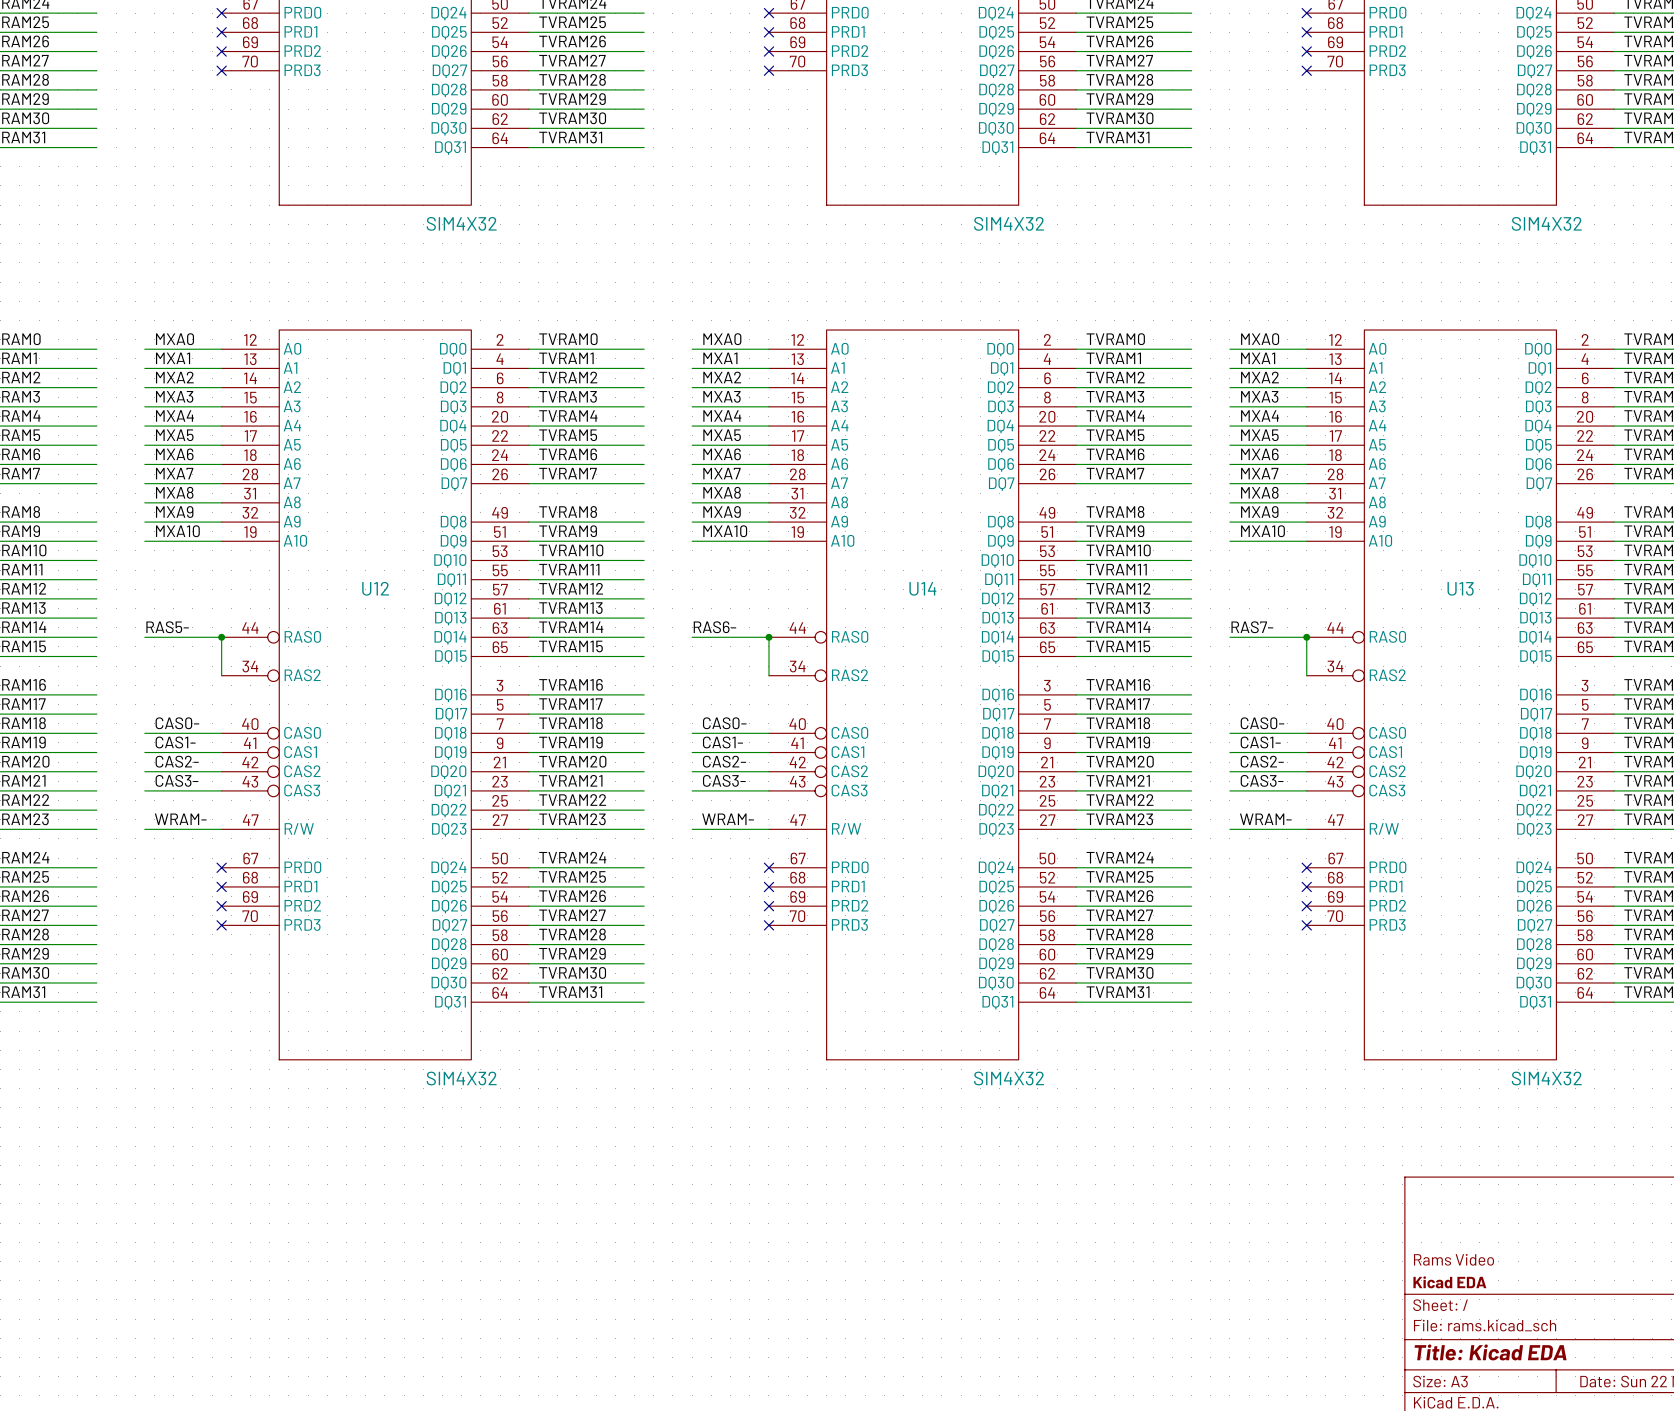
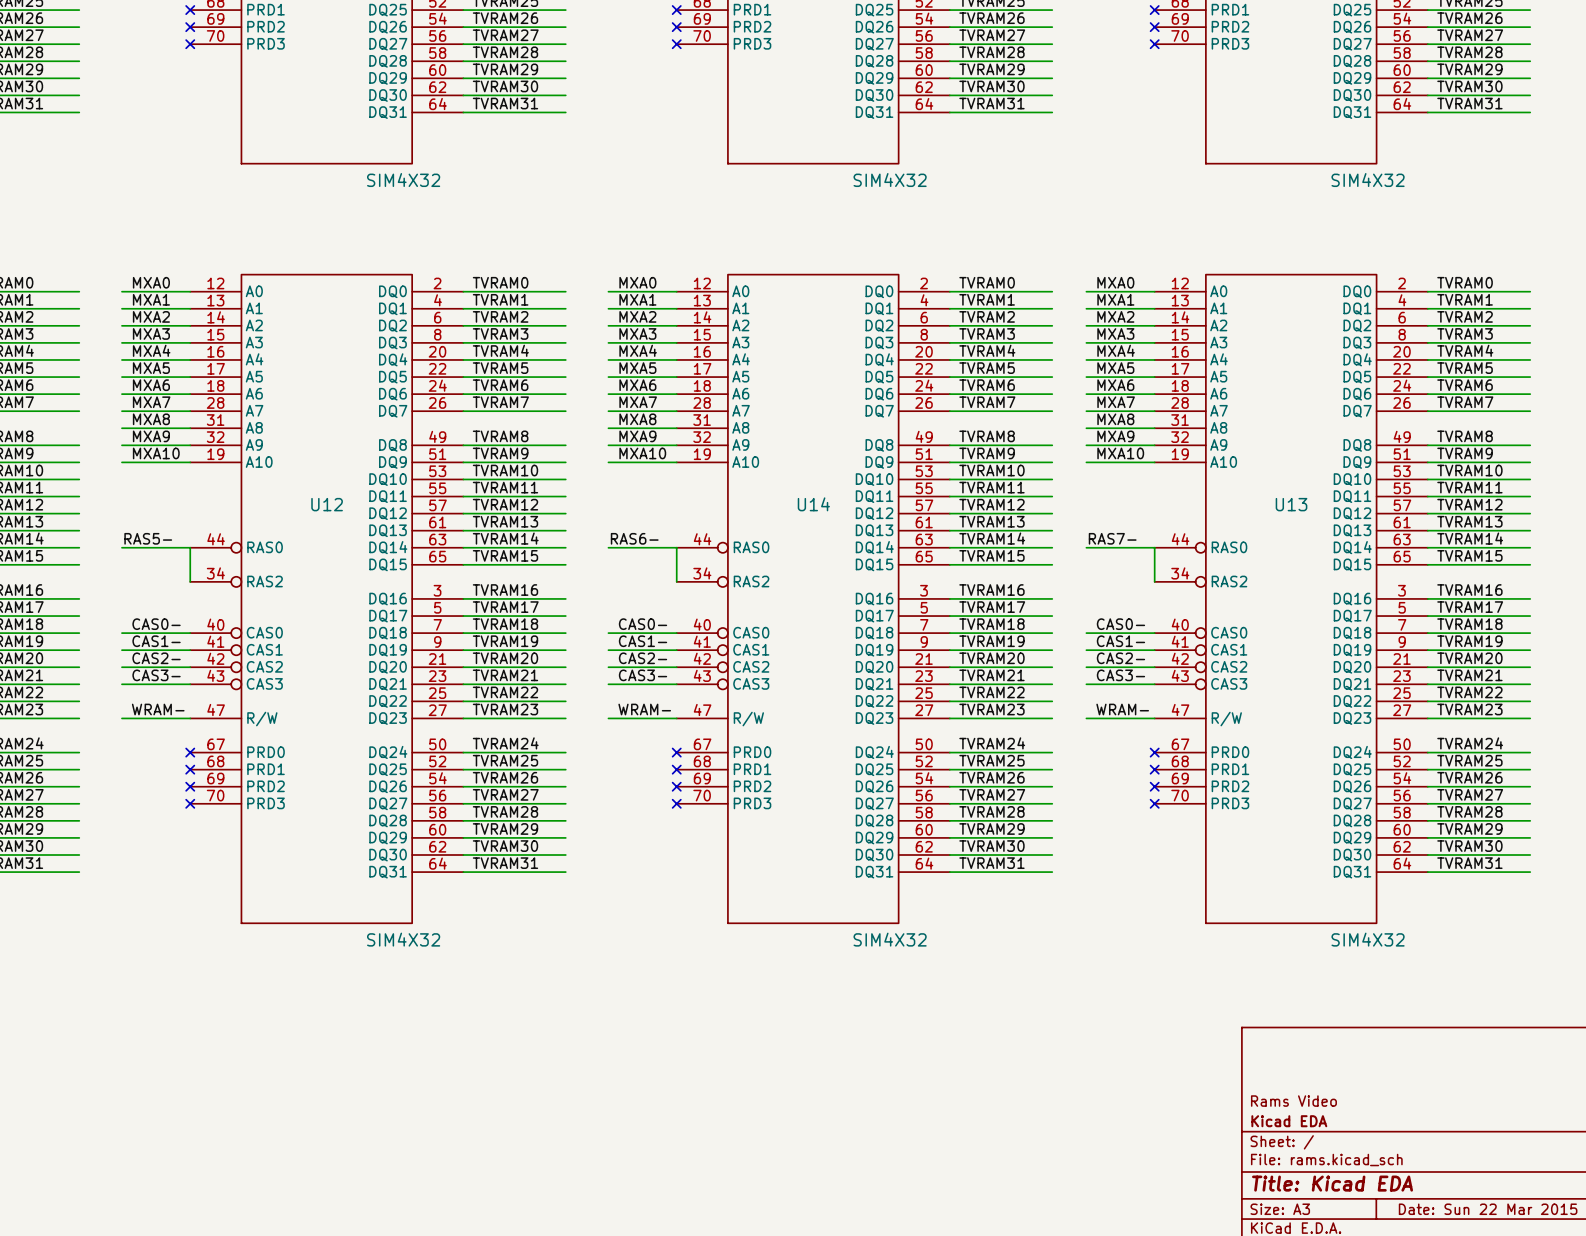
junction: (221, 637) -> none
junction: (768, 637) -> none
junction: (1306, 637) -> none

